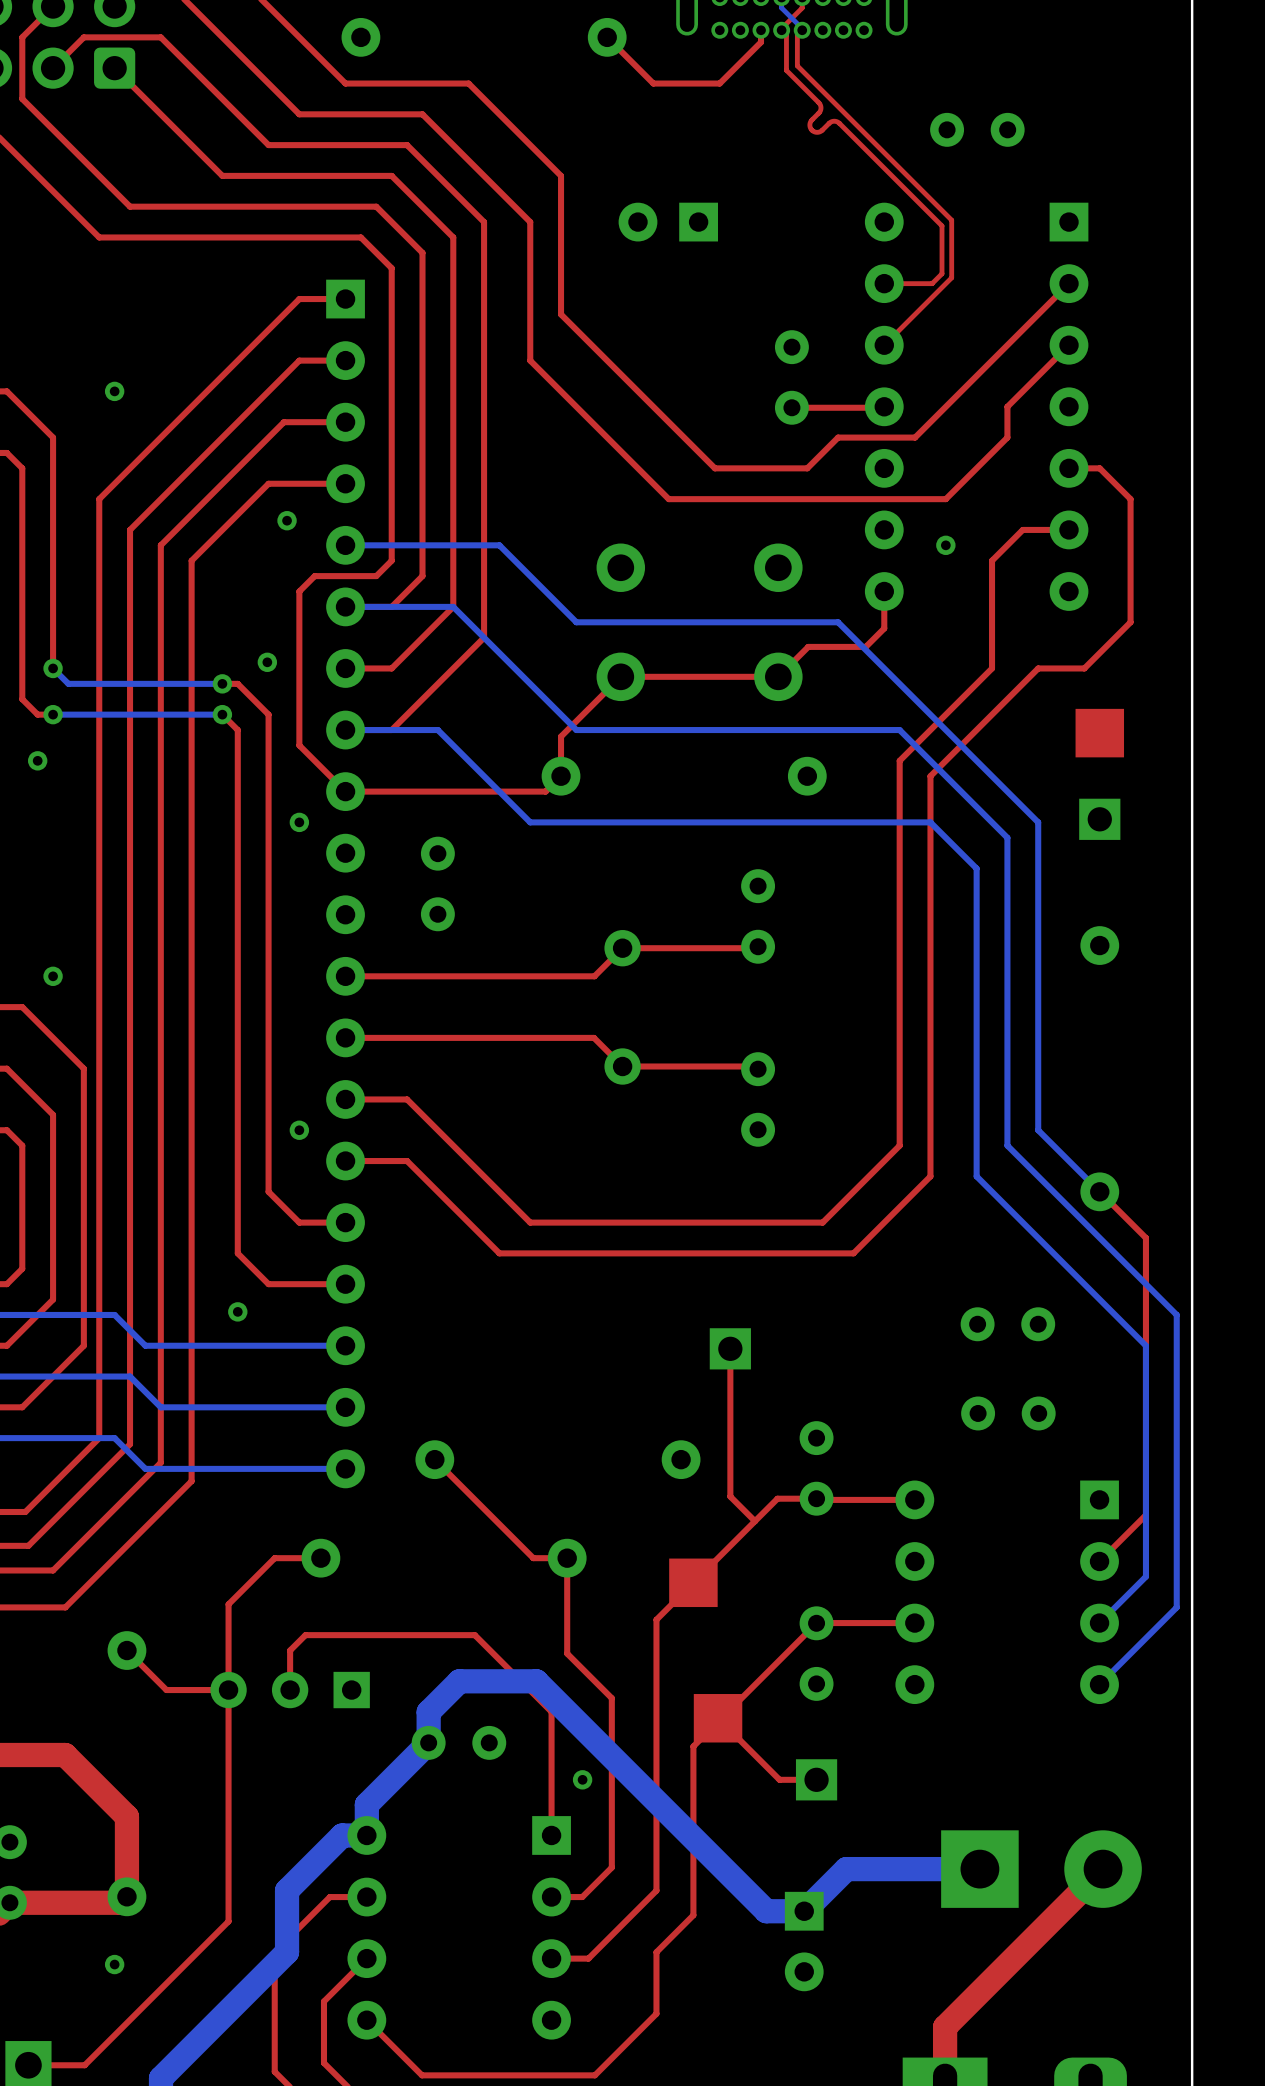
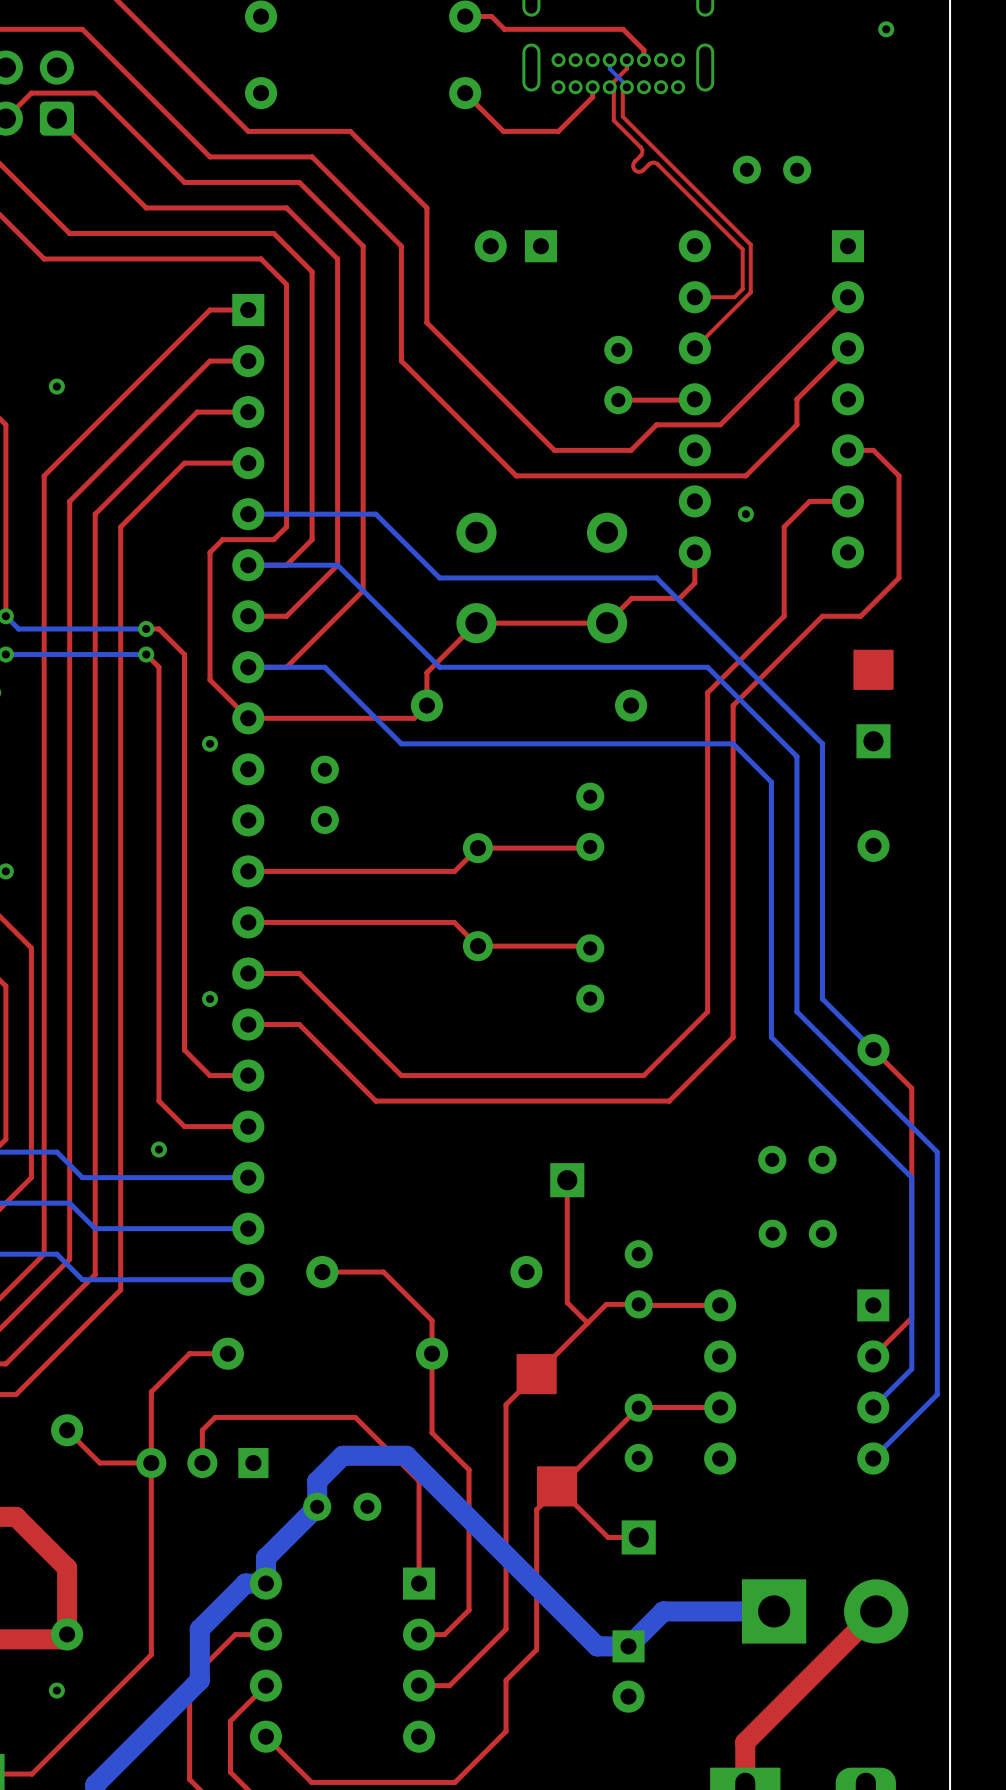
via: (287, 520) -> none
via: (267, 662) -> none
top track: (434, 1459) (533, 1558) (567, 1558) -> (322, 1272) (383, 1272) (432, 1320) (432, 1353)
via: (582, 1779) -> none

